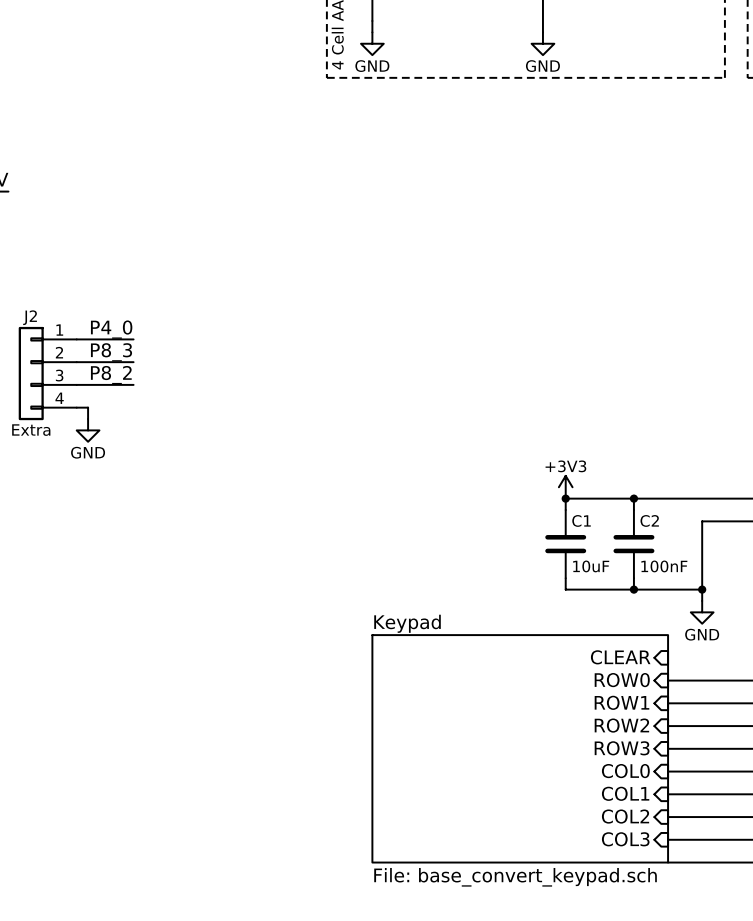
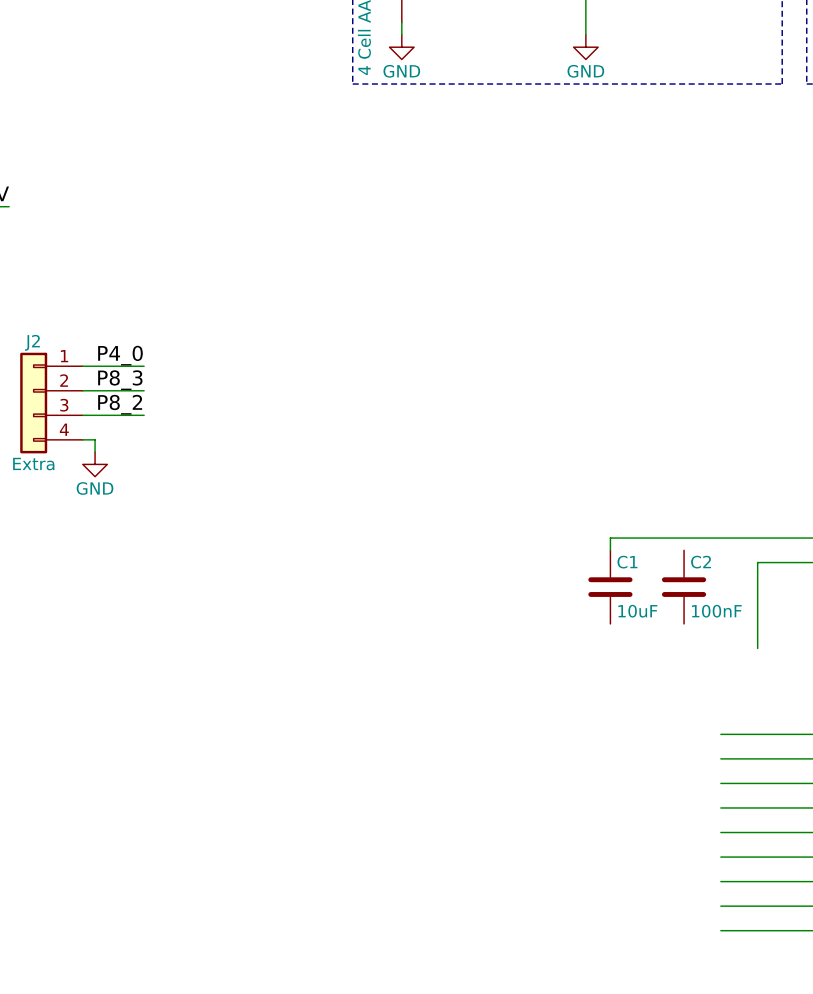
power symbol: +3V3 (565, 487) -> none
junction: (565, 498) -> none
wire: (633, 498) (633, 510) -> none
junction: (633, 498) -> none
wire: (565, 578) (565, 589) (702, 589) -> none
wire: (633, 578) (633, 589) -> none
junction: (633, 589) -> none
junction: (702, 589) -> none
power symbol: GND (702, 612) -> none
sheet pin: CLEAR (620, 657) -> none
sheet pin: ROW0 (622, 680) -> none
sheet pin: ROW1 (621, 702) -> none
sheet pin: ROW2 (621, 725) -> none
sheet Keypad: File: base_convert_keypad.sch (520, 748) -> none
sheet pin: ROW3 (622, 748) -> none
sheet pin: COL0 (625, 771) -> none
sheet pin: COL1 (625, 793) -> none
sheet pin: COL2 (625, 816) -> none
sheet pin: COL3 (625, 839) -> none

